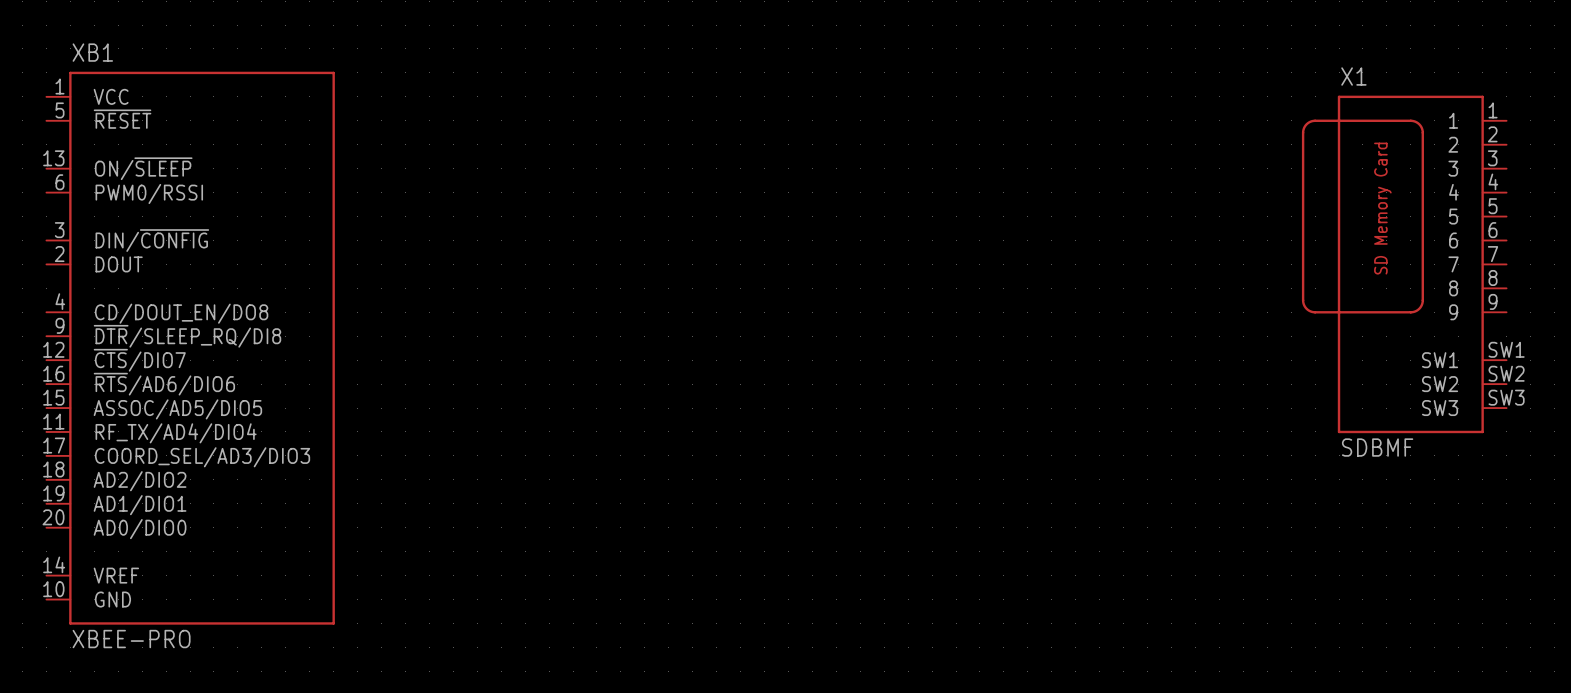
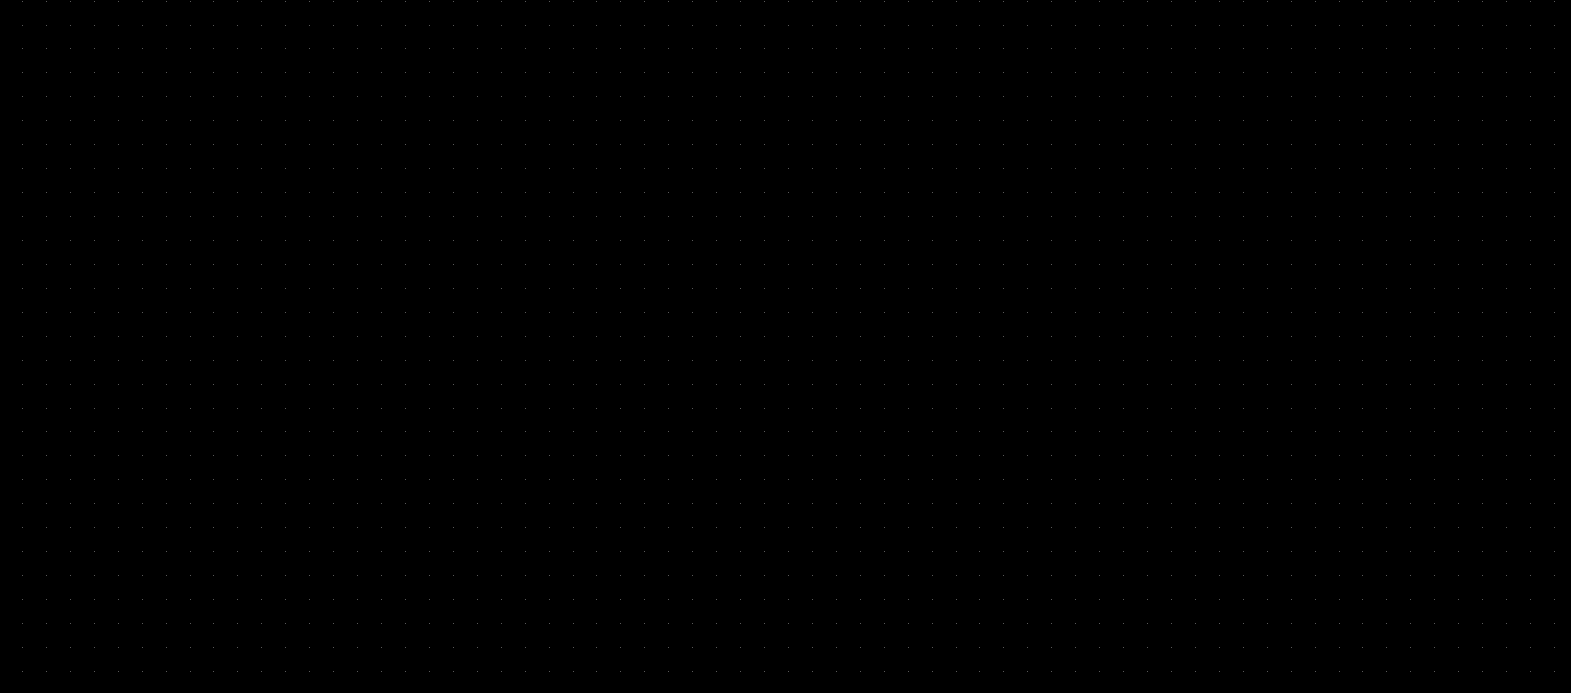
X1: SDBMF (1404, 264) -> none
XB1: XBEE-PRO (190, 348) -> none

